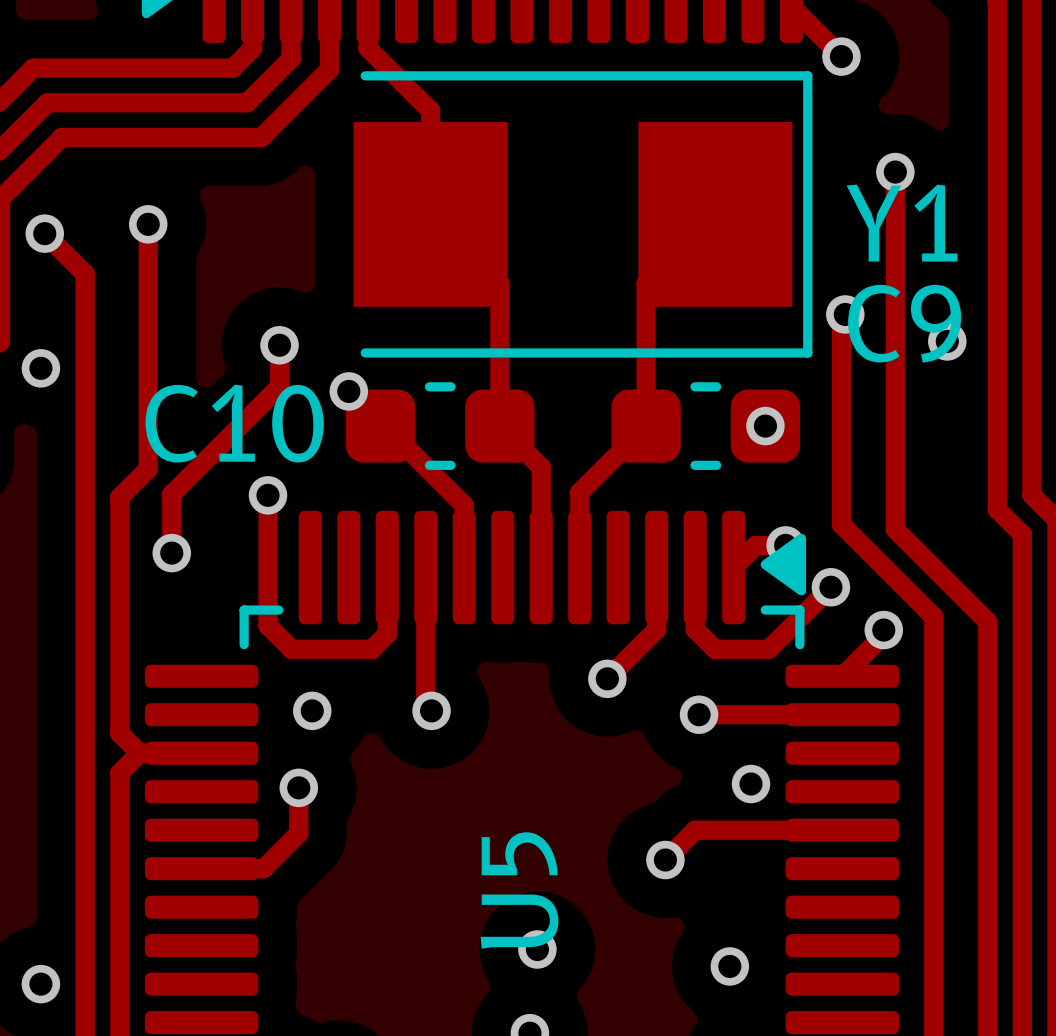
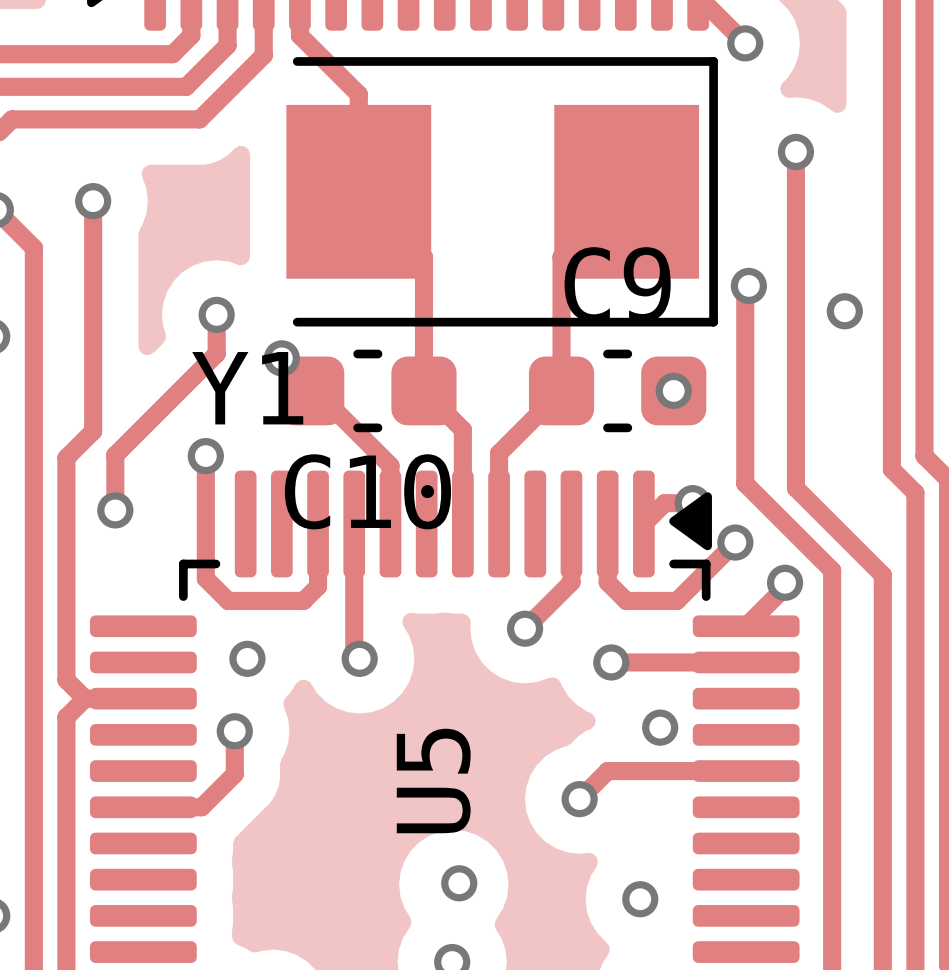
Y1 name position: Y1 (902, 223) -> Y1 (247, 388)
C9 name position: C9 (904, 323) -> C9 (617, 284)
C10 name position: C10 (234, 423) -> C10 (367, 491)
U5 name position: U5 (519, 890) -> U5 (433, 780)

